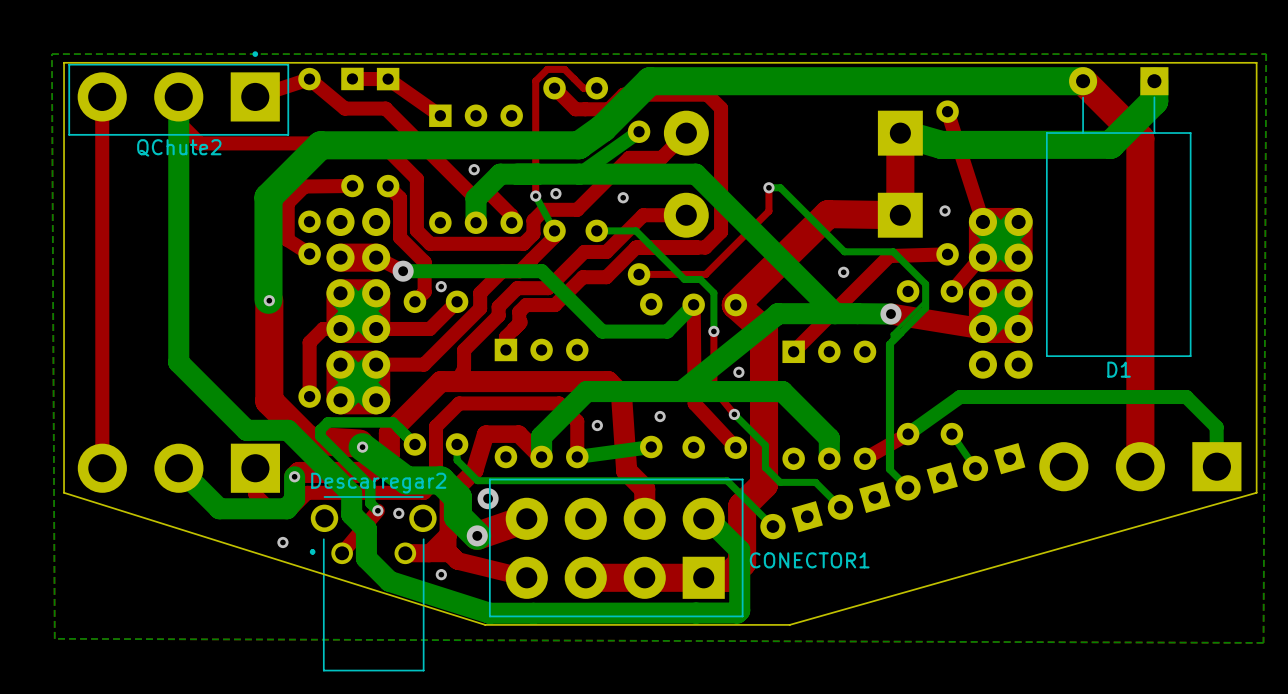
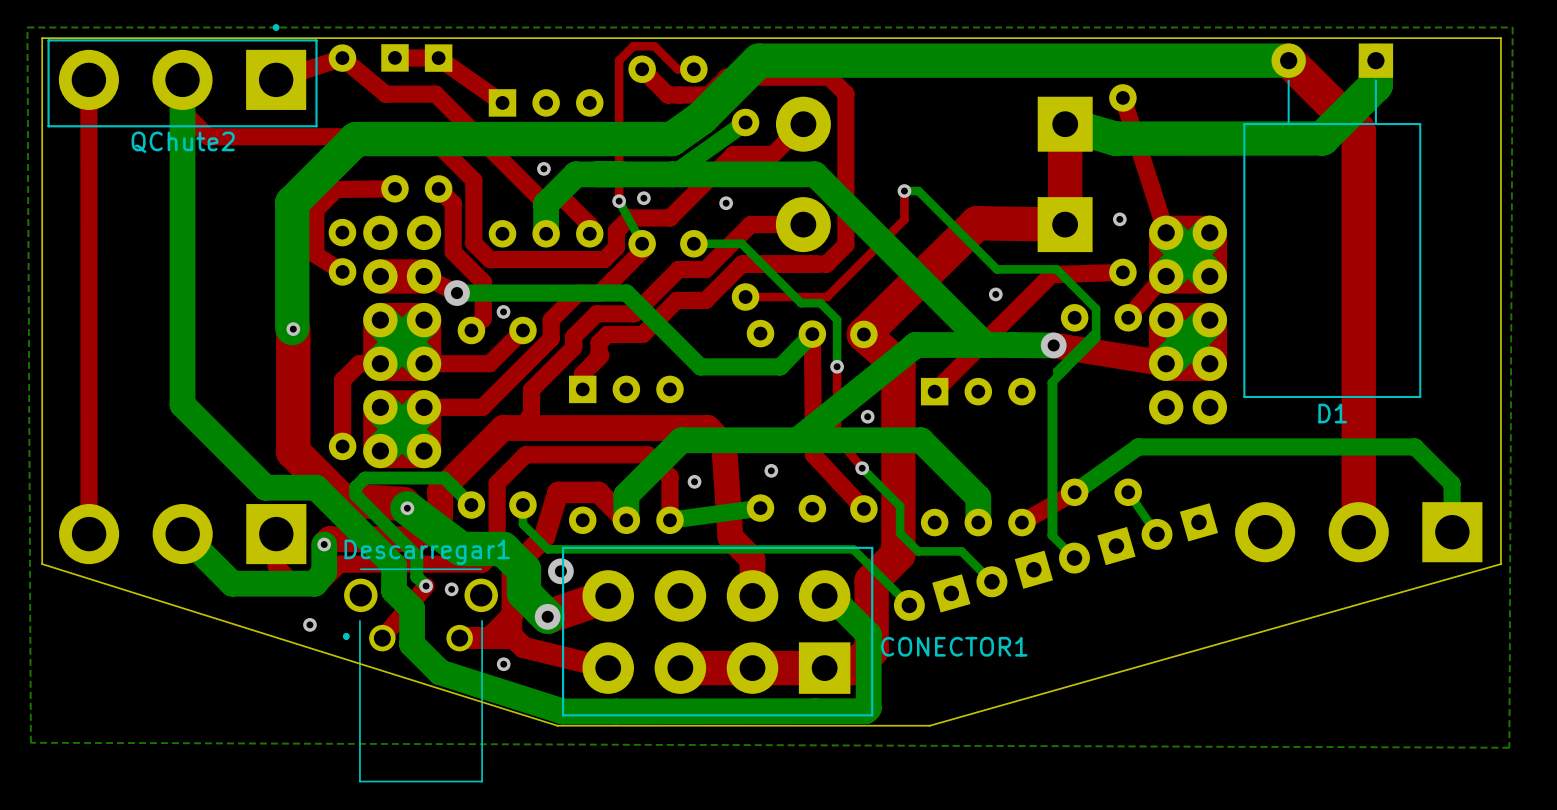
Descarregar2 name: Descarregar2 (378, 483) -> Descarregar1 (427, 552)

